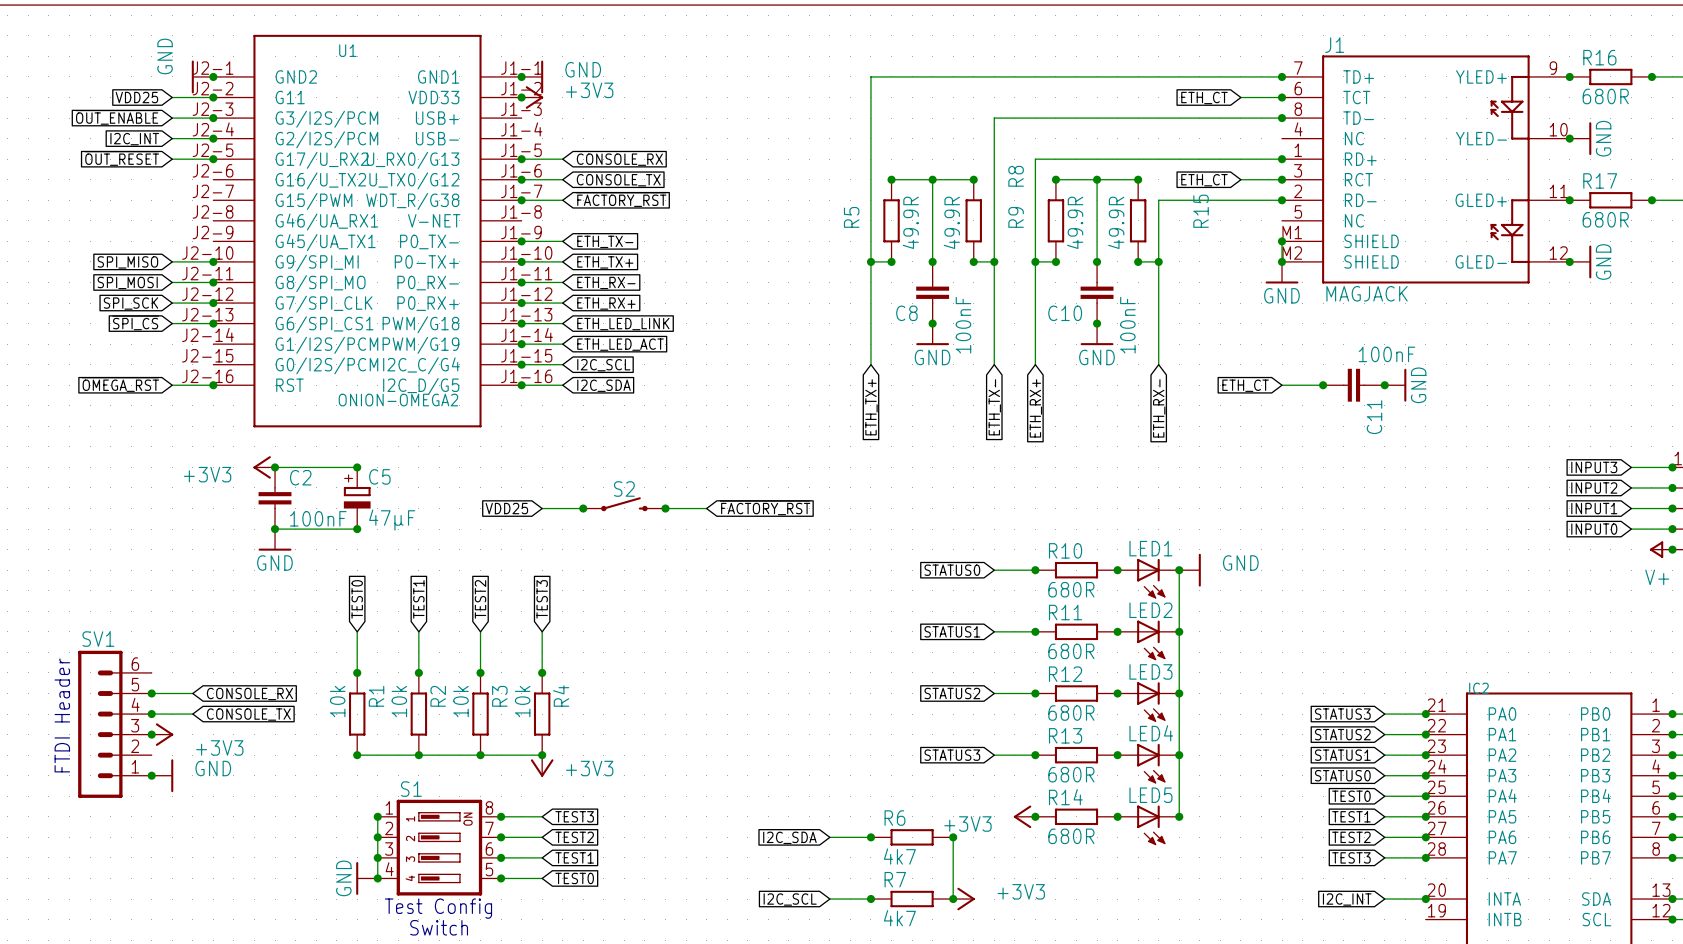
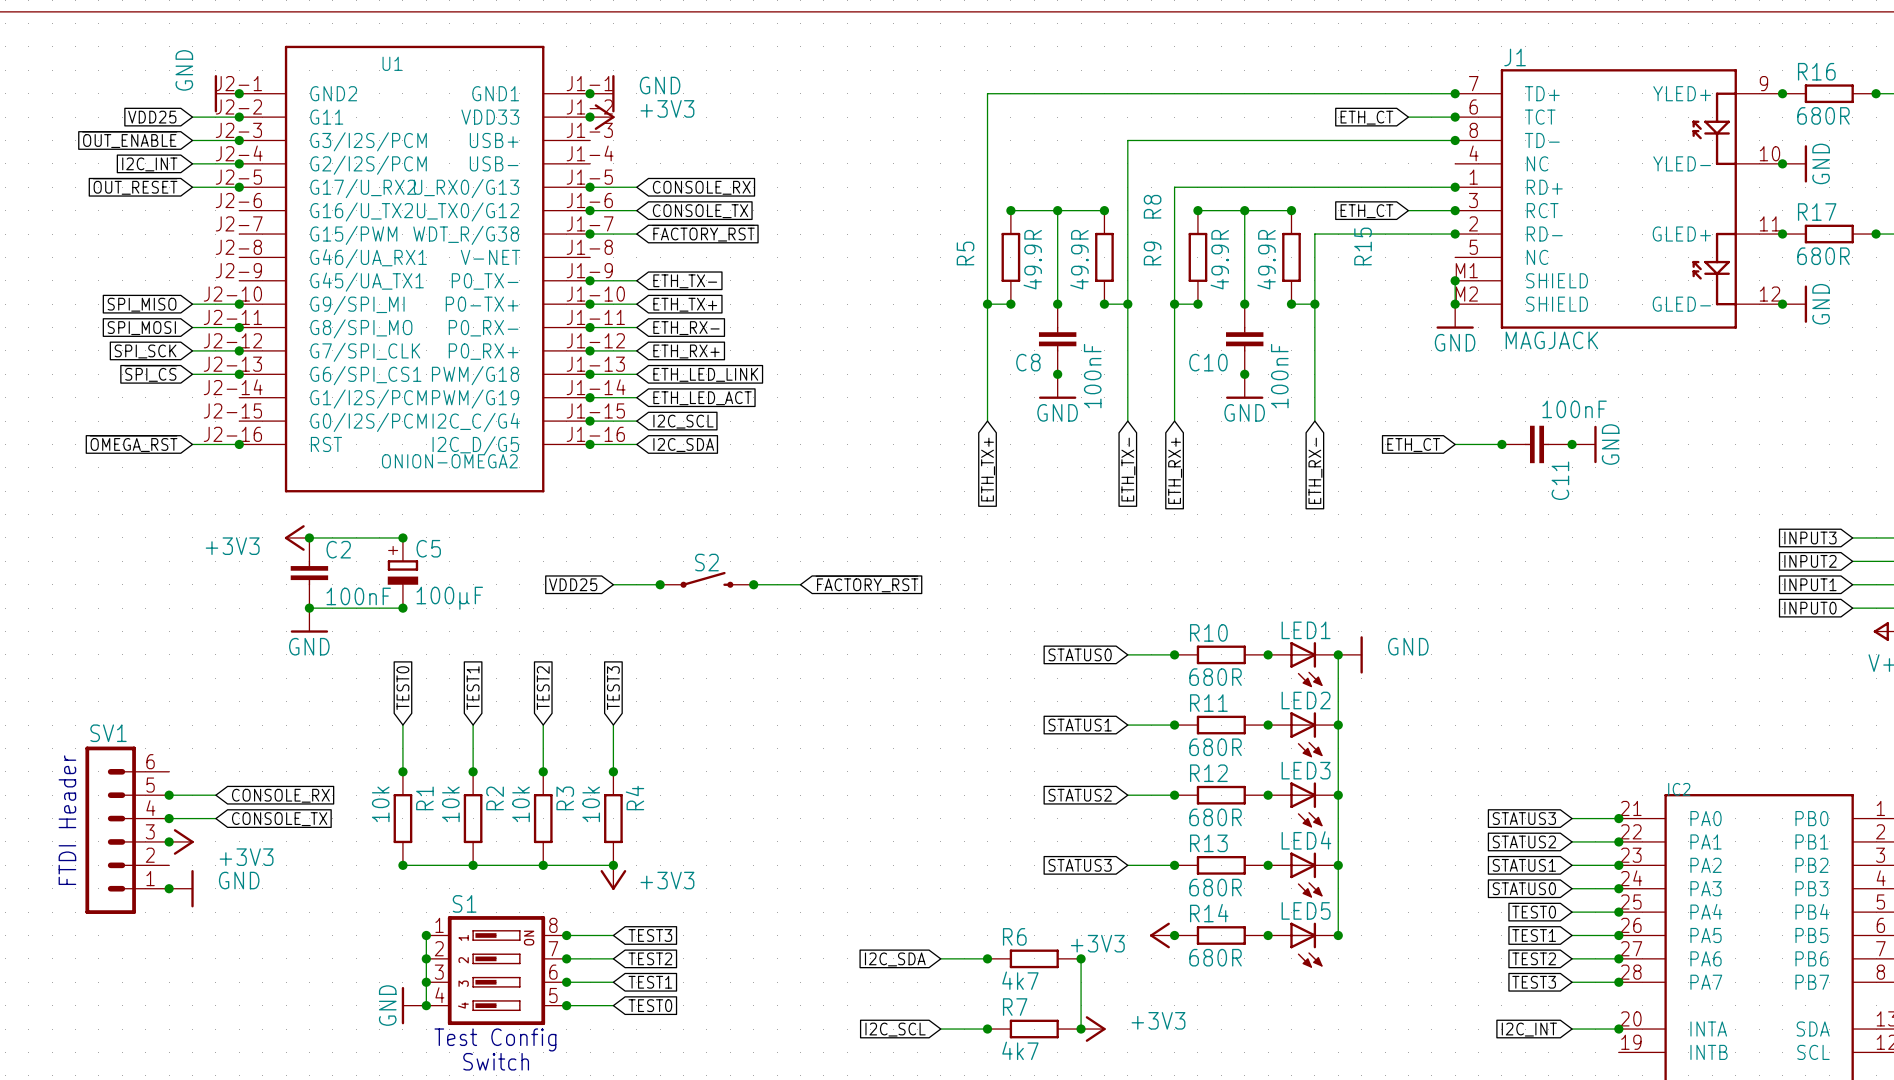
C5 value: 47µF (392, 520) -> 100µF (449, 598)

